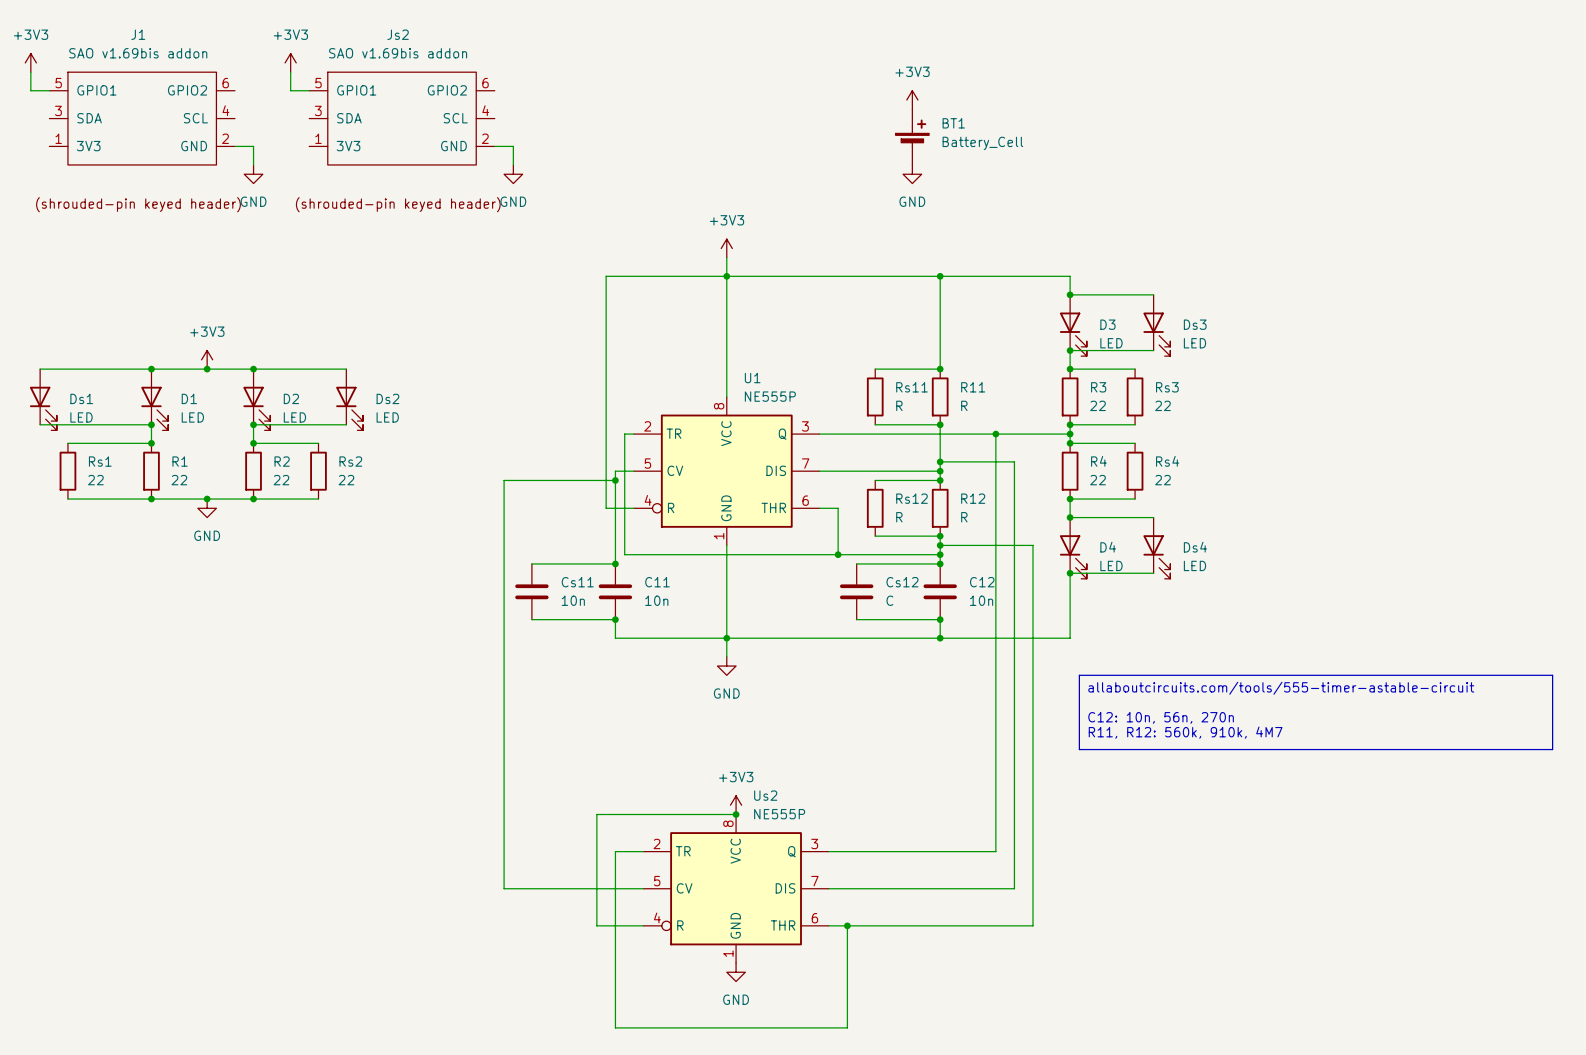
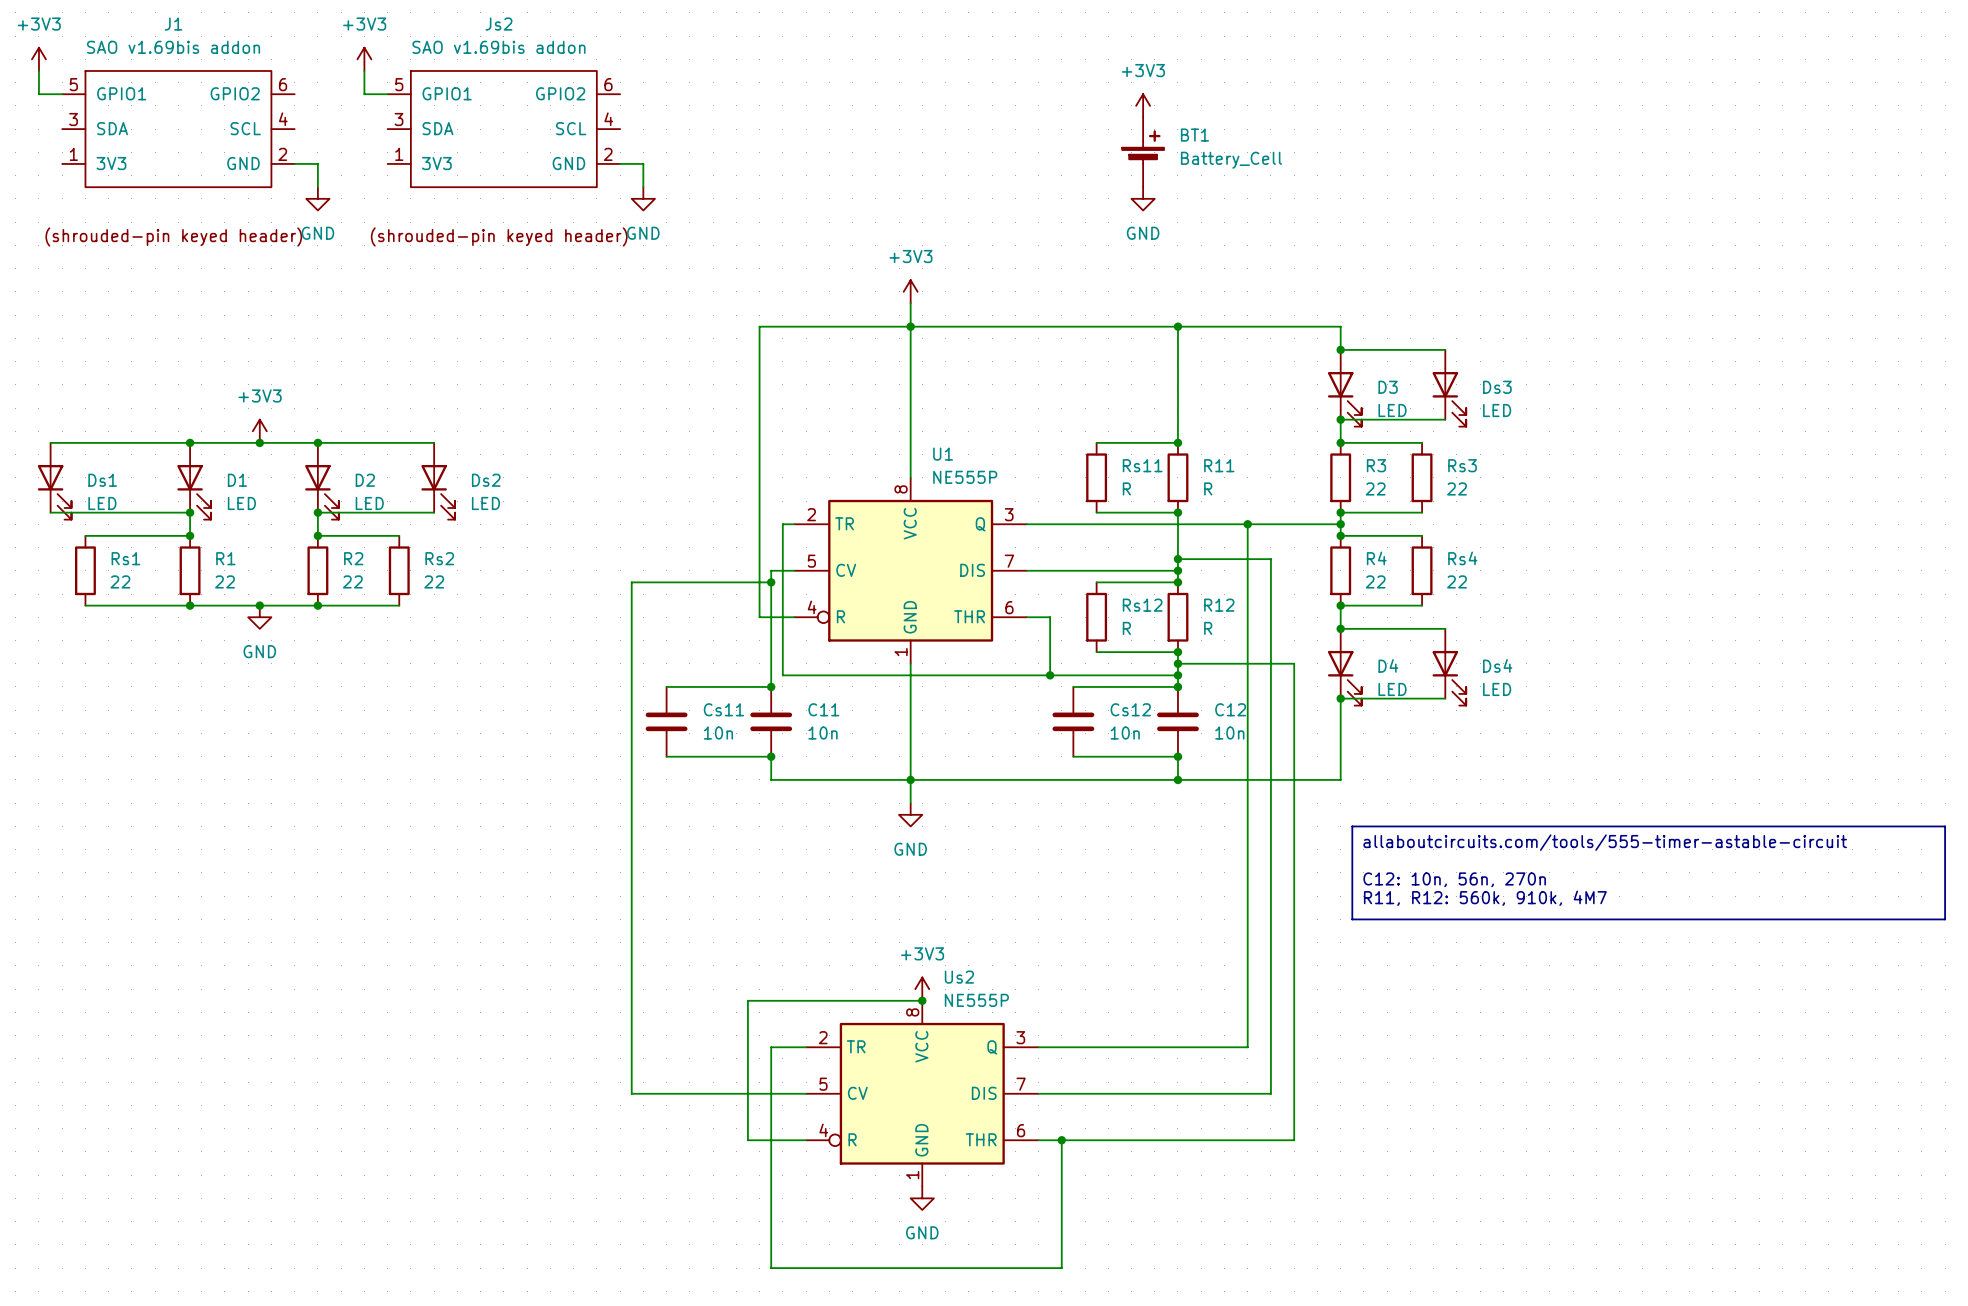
Cs12 value: C (889, 600) -> 10n (1125, 733)

